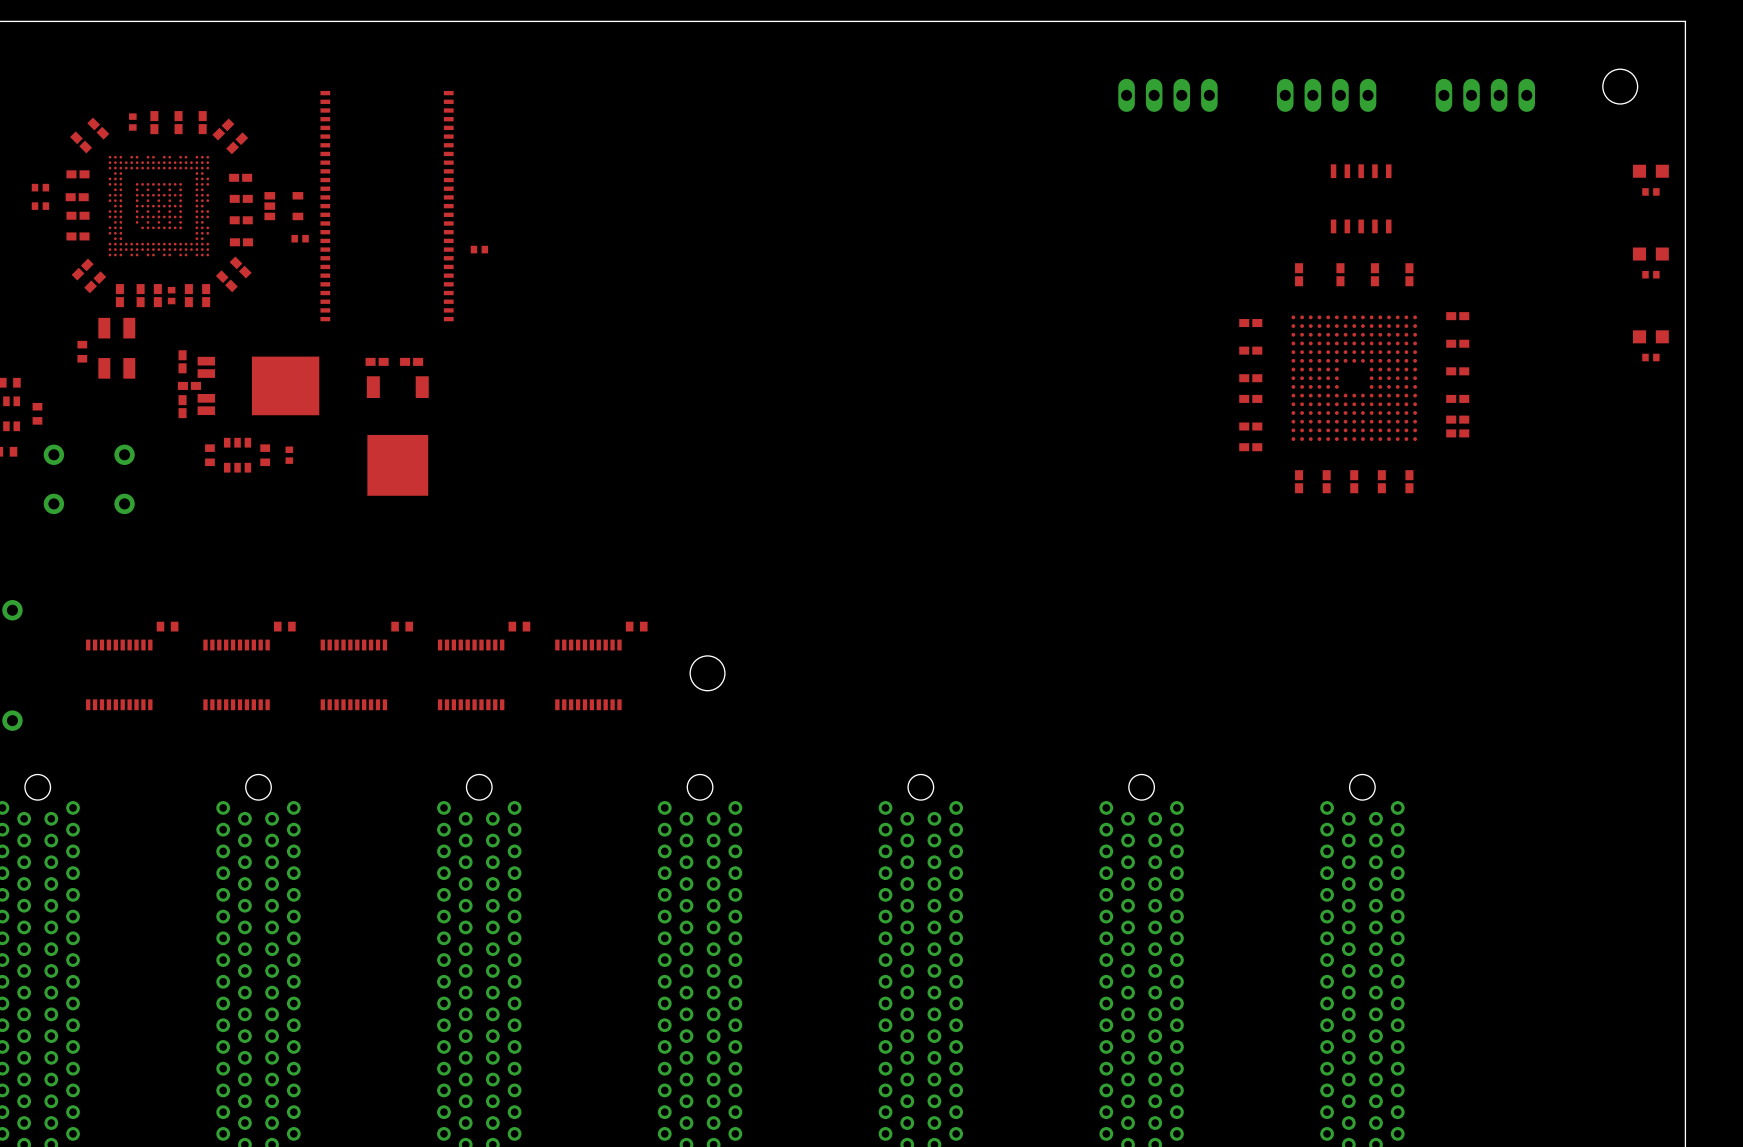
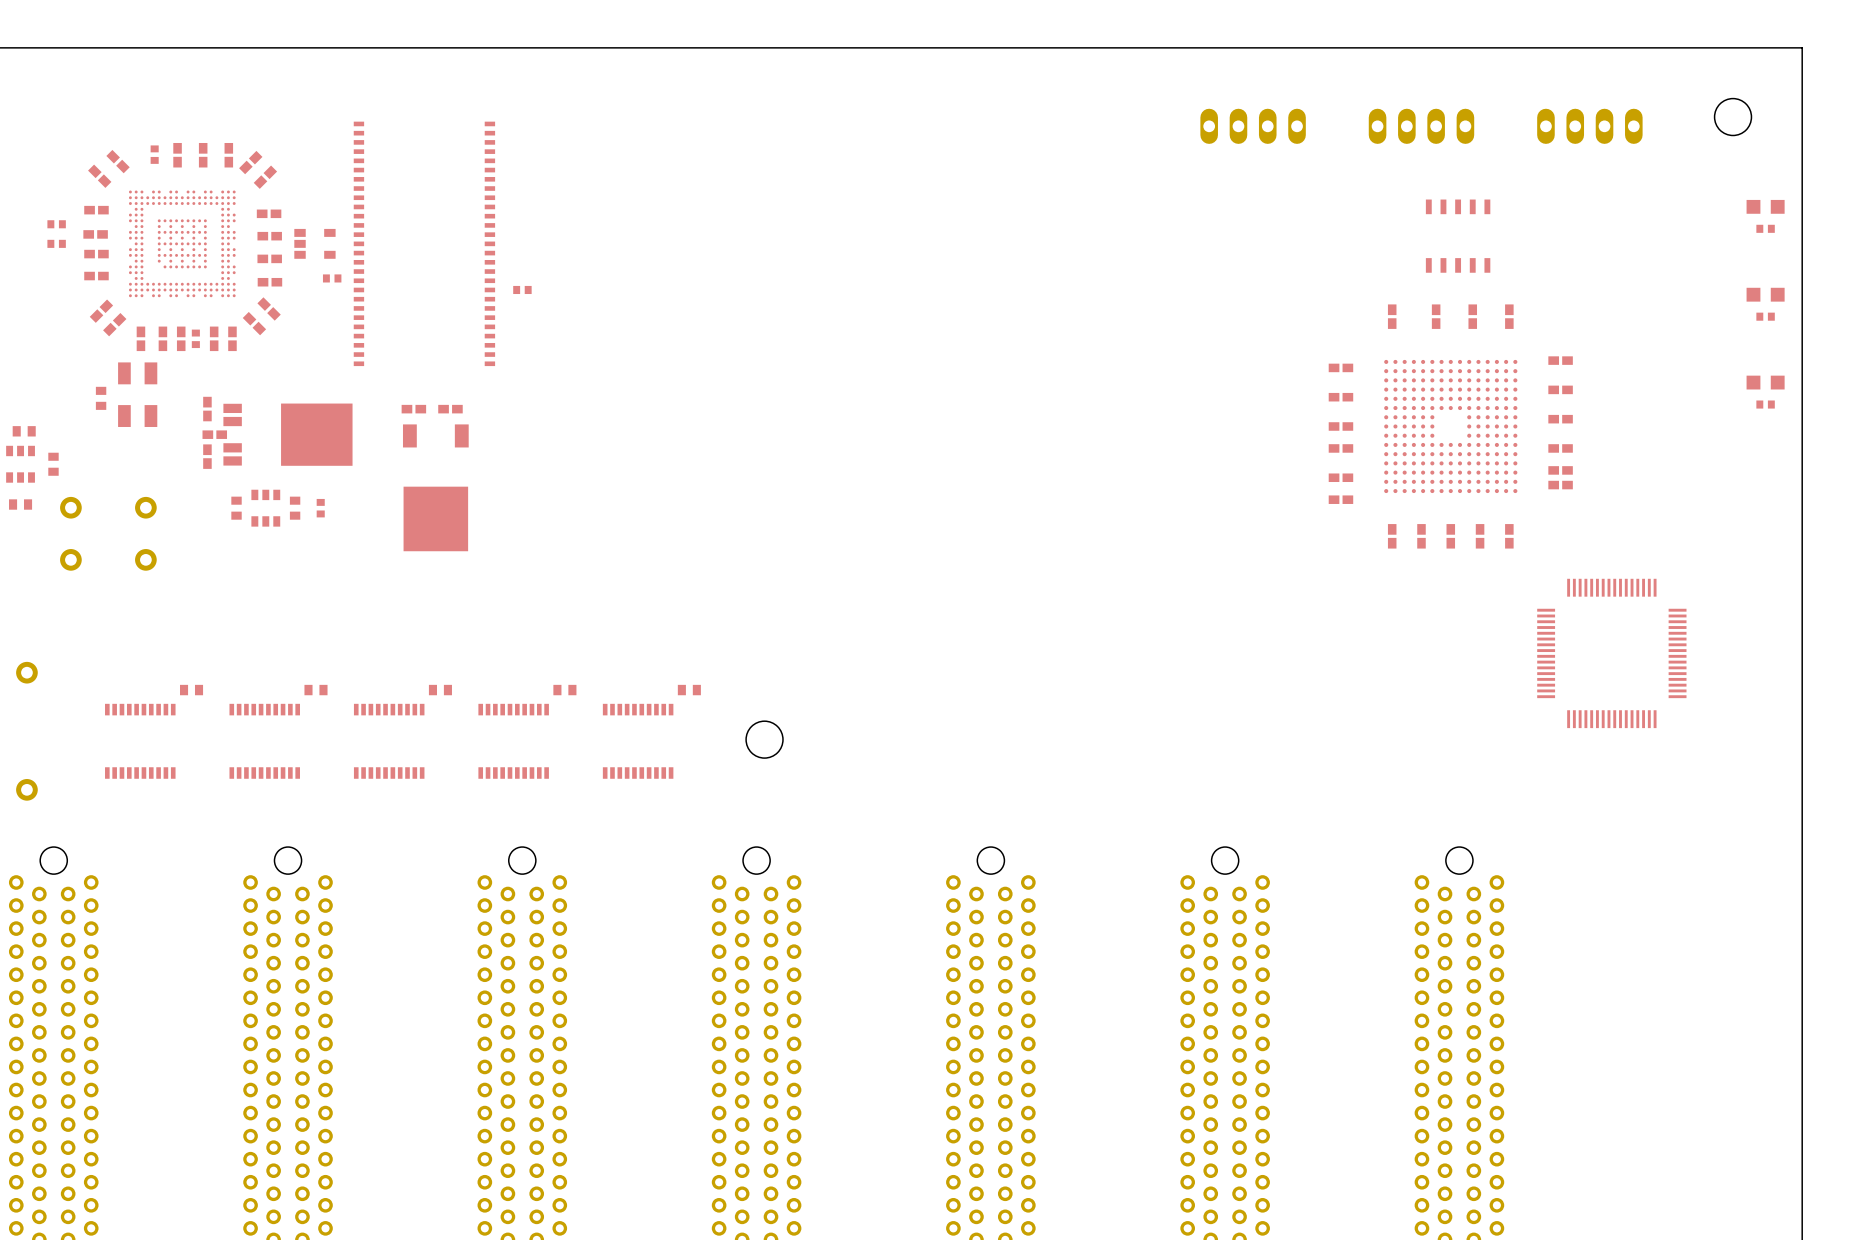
part: none -> (1611, 653)

